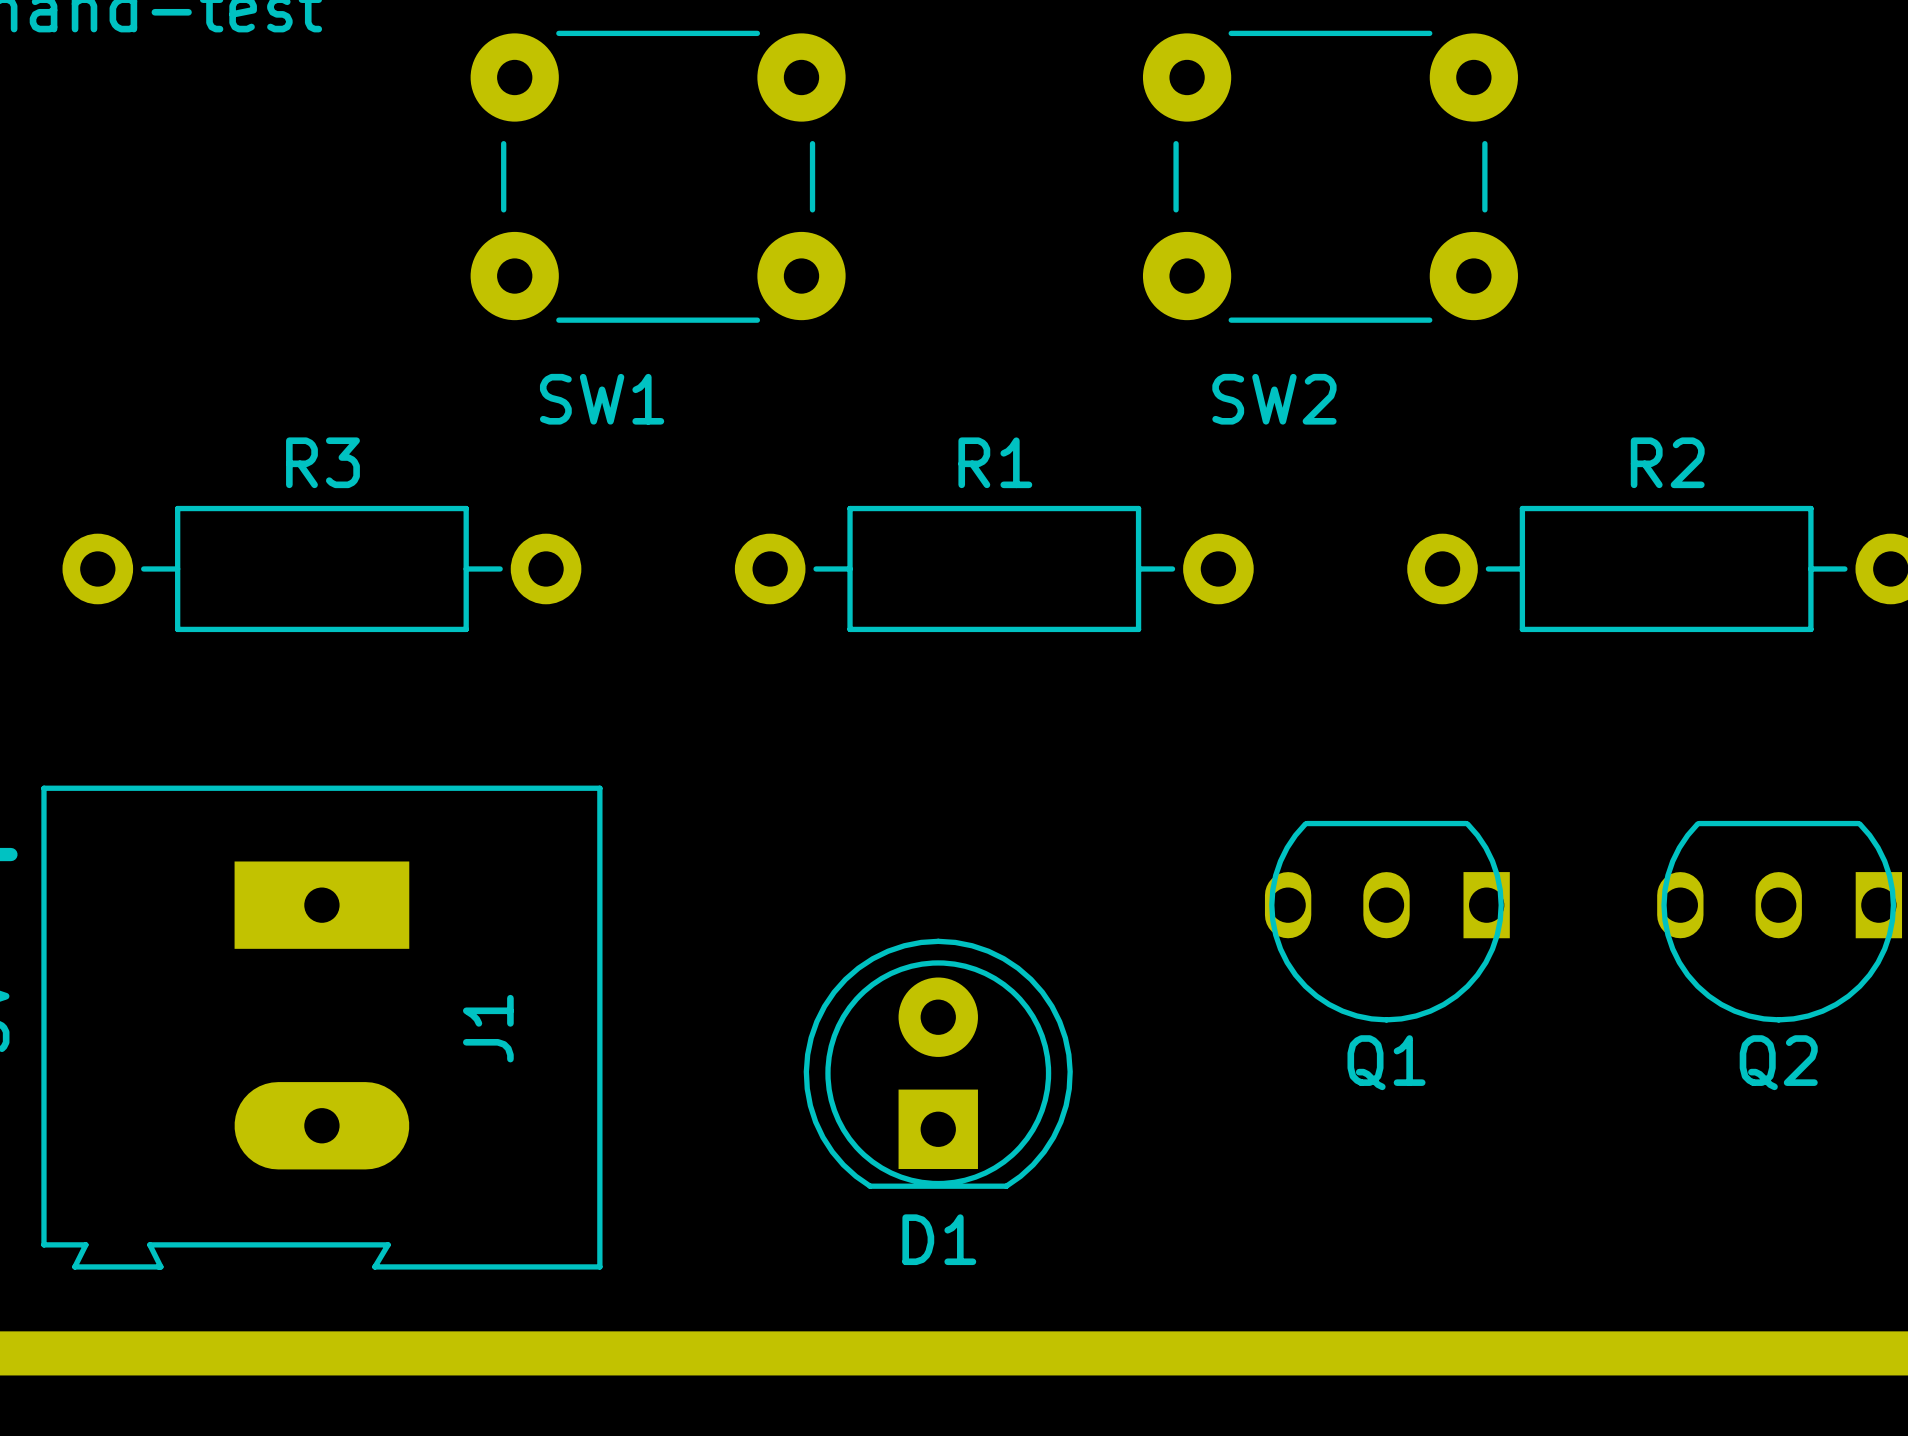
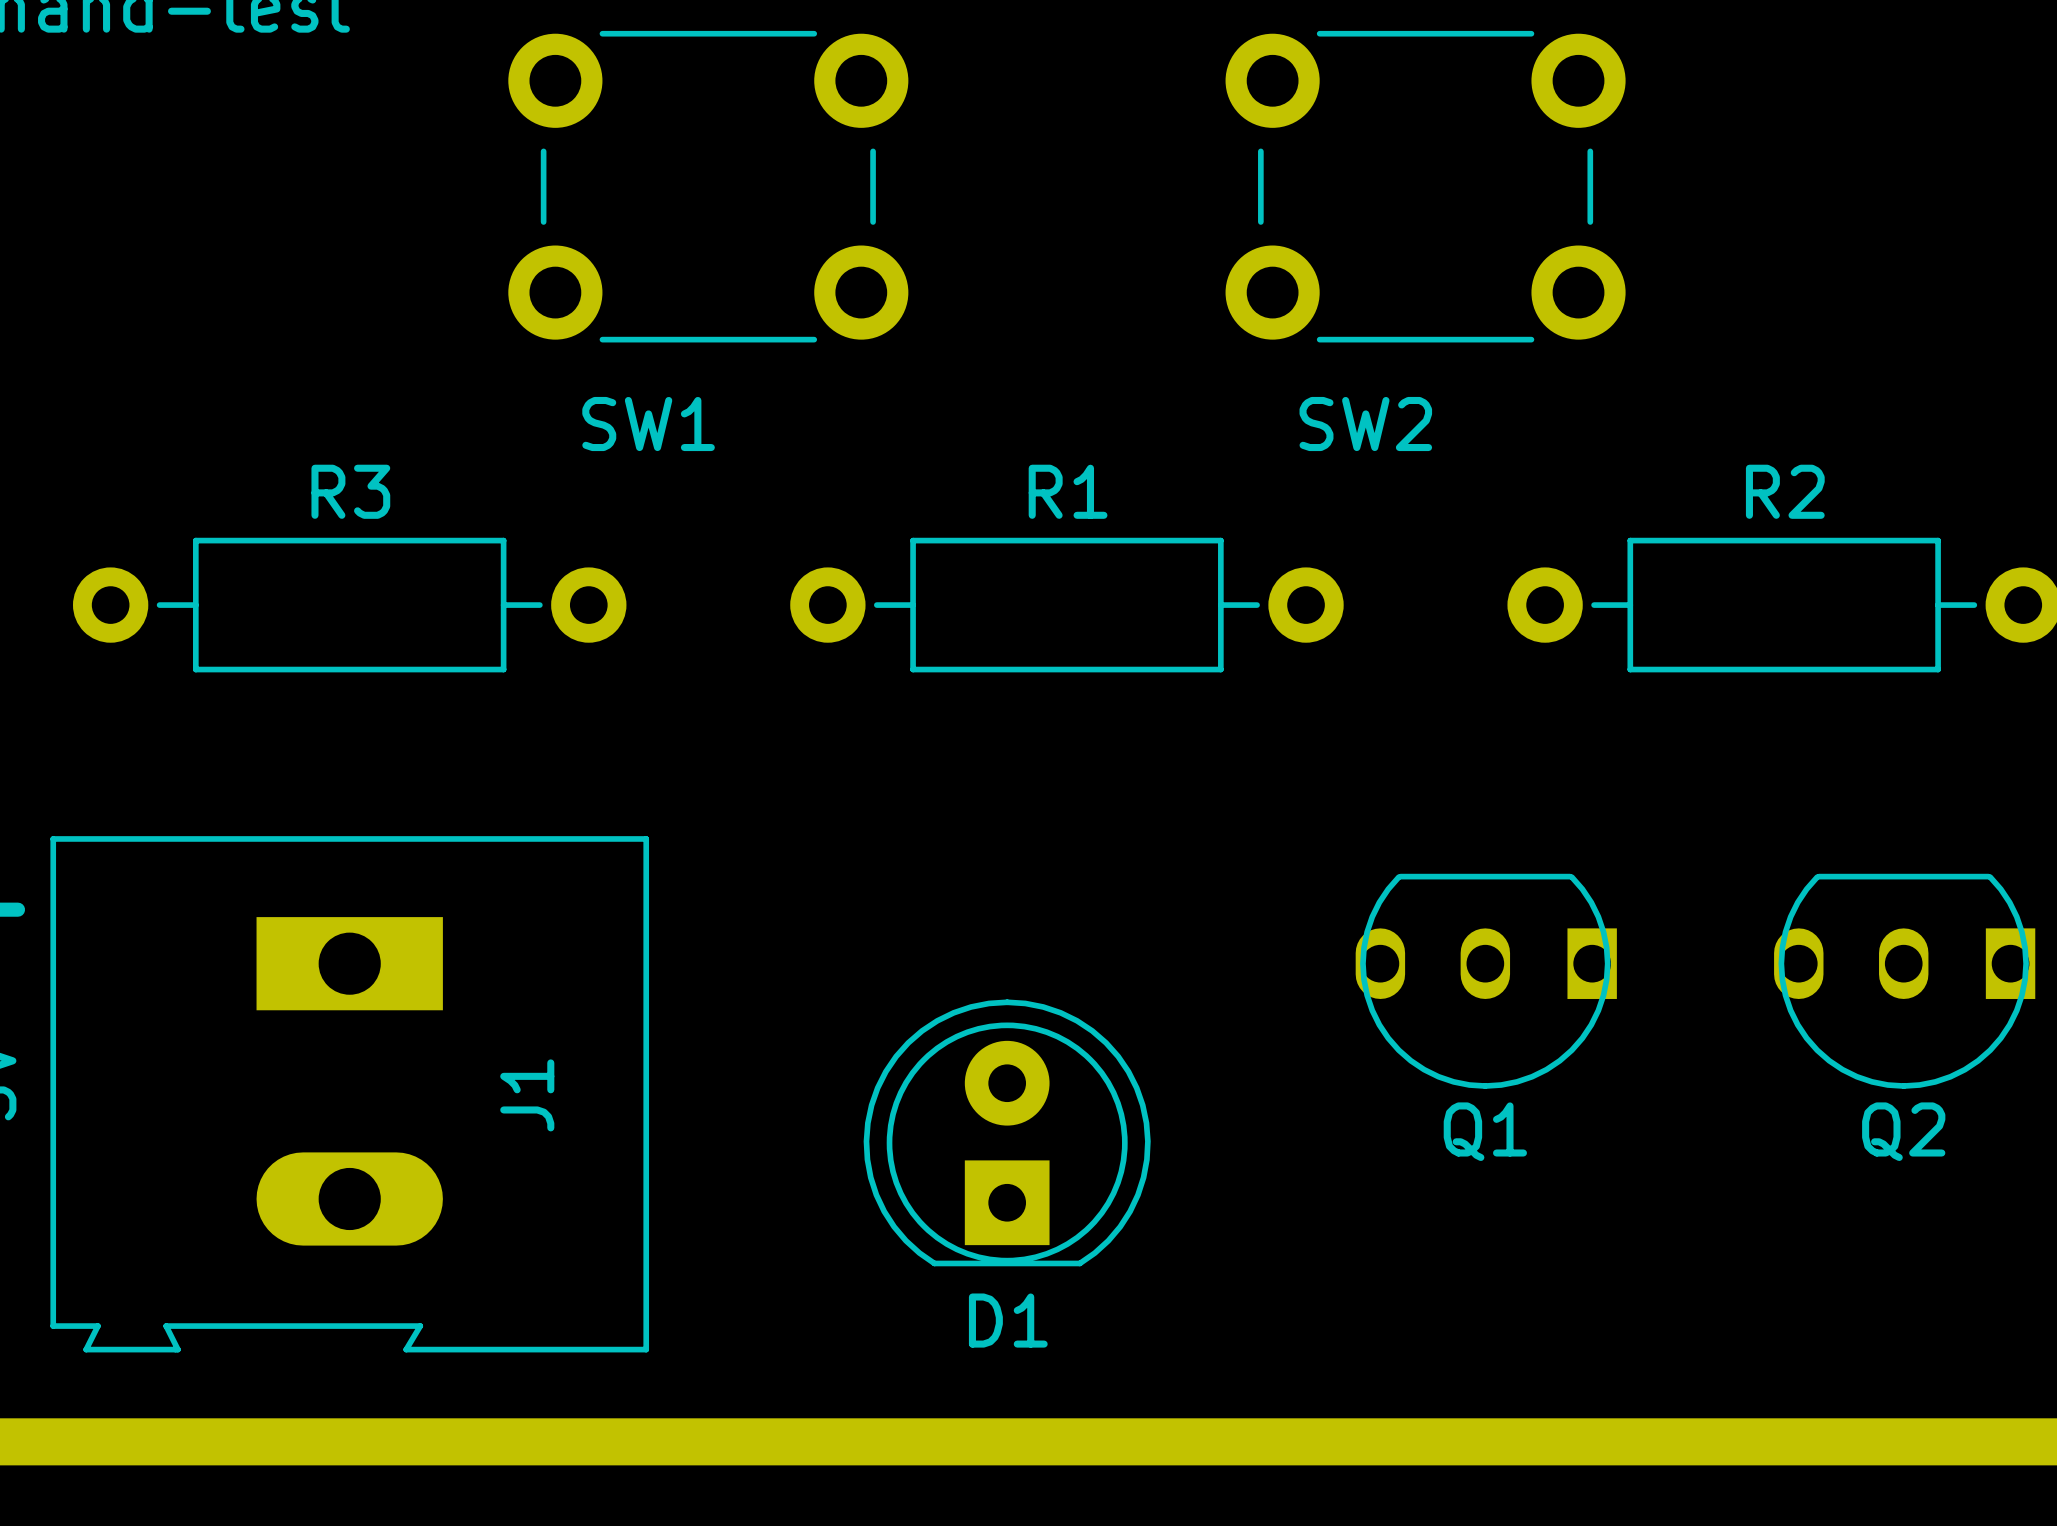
SW1 footprint: [470, 30, 846, 323] -> [508, 30, 909, 343]
SW2 footprint: [1142, 30, 1518, 323] -> [1225, 30, 1626, 343]
J1 footprint: [41, 785, 603, 1270] -> [50, 836, 650, 1353]

